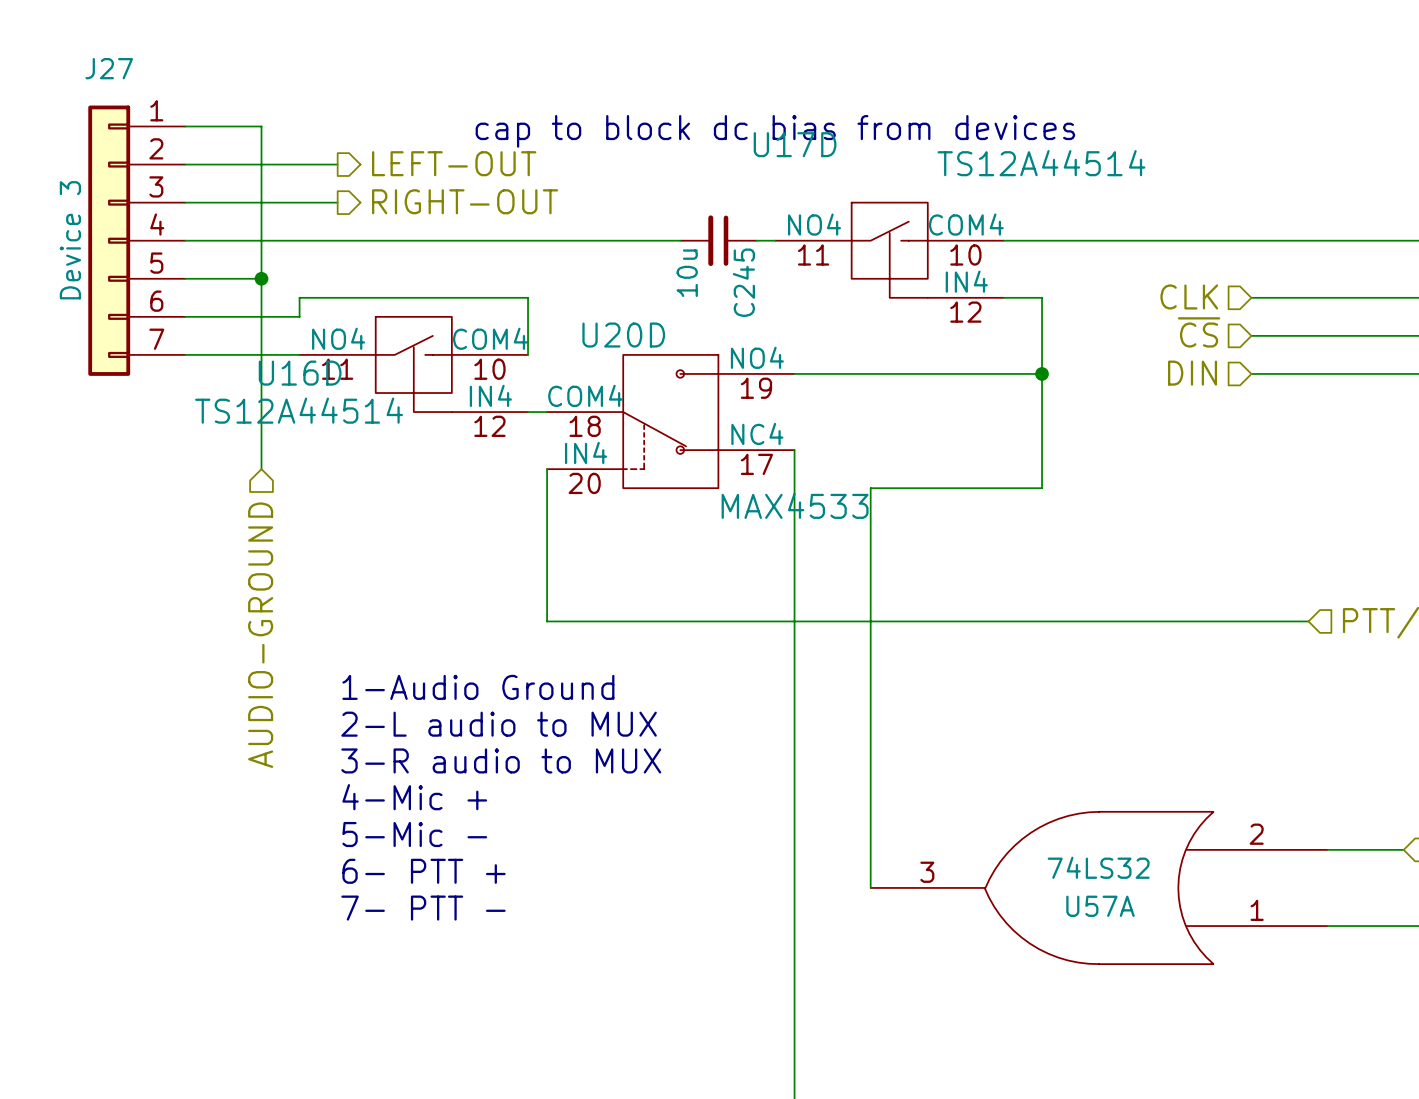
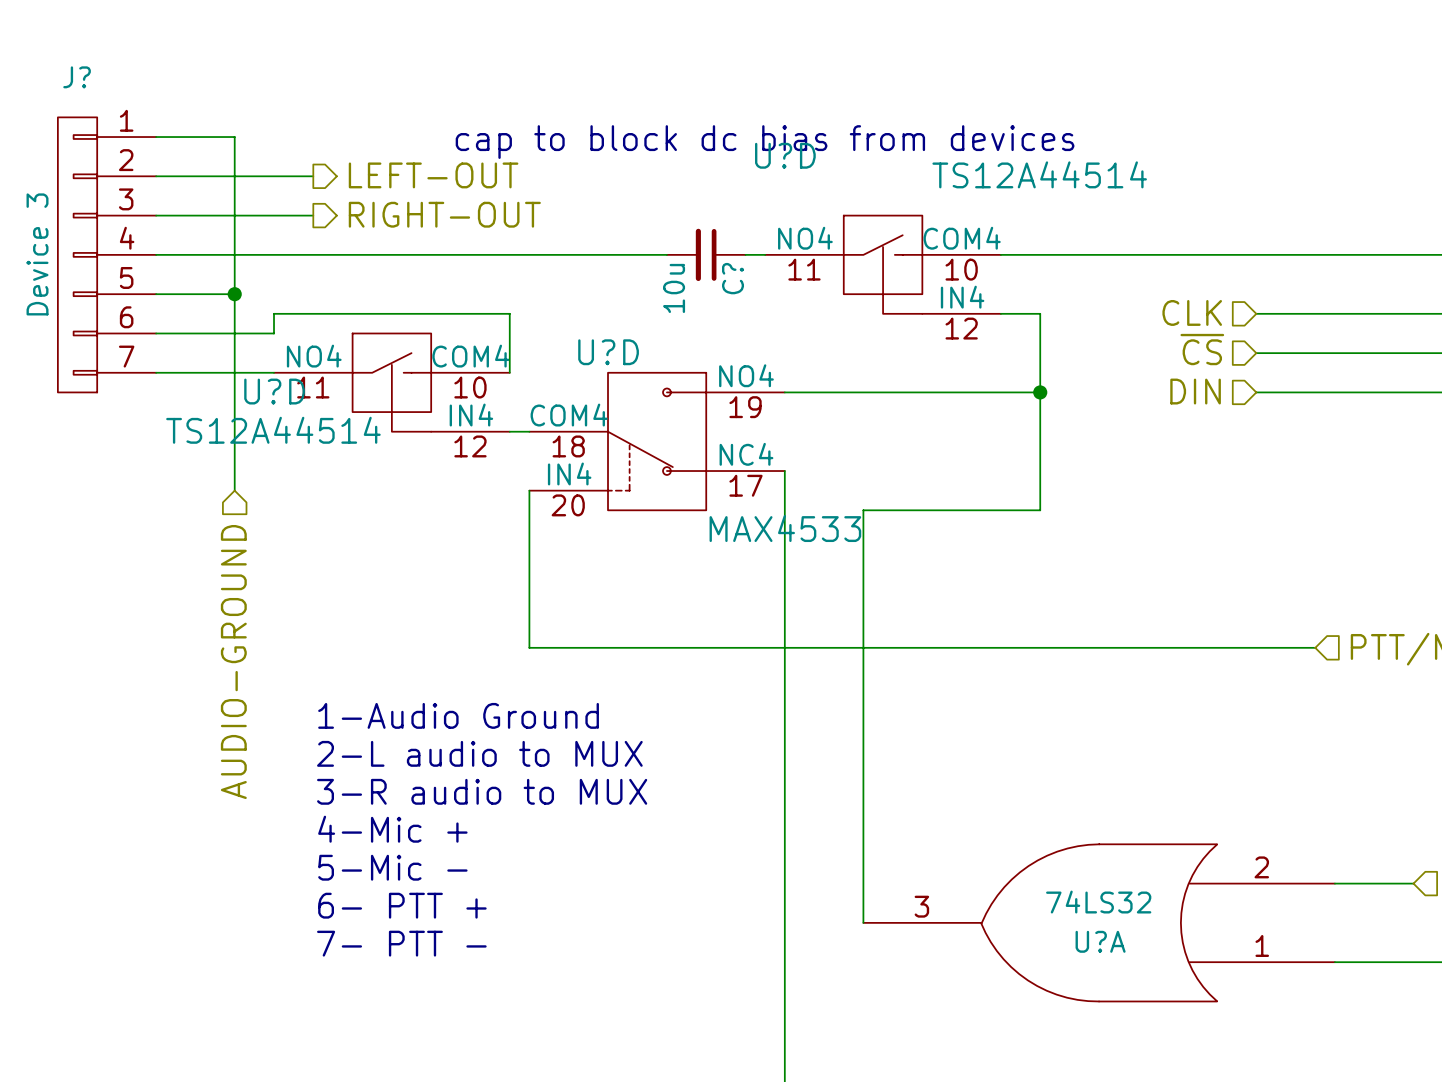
U17D name: U17D (795, 144) -> U?D (785, 155)
J27: Device 3 (136, 240) -> none
J?: none -> Device 3 (107, 254)
C245 name: C245 (743, 282) -> C? (733, 278)
U20D name: U20D (623, 335) -> U?D (608, 352)
U16D name: U16D (300, 373) -> U?D (274, 391)
U57A name: U57A (1100, 906) -> U?A (1100, 941)

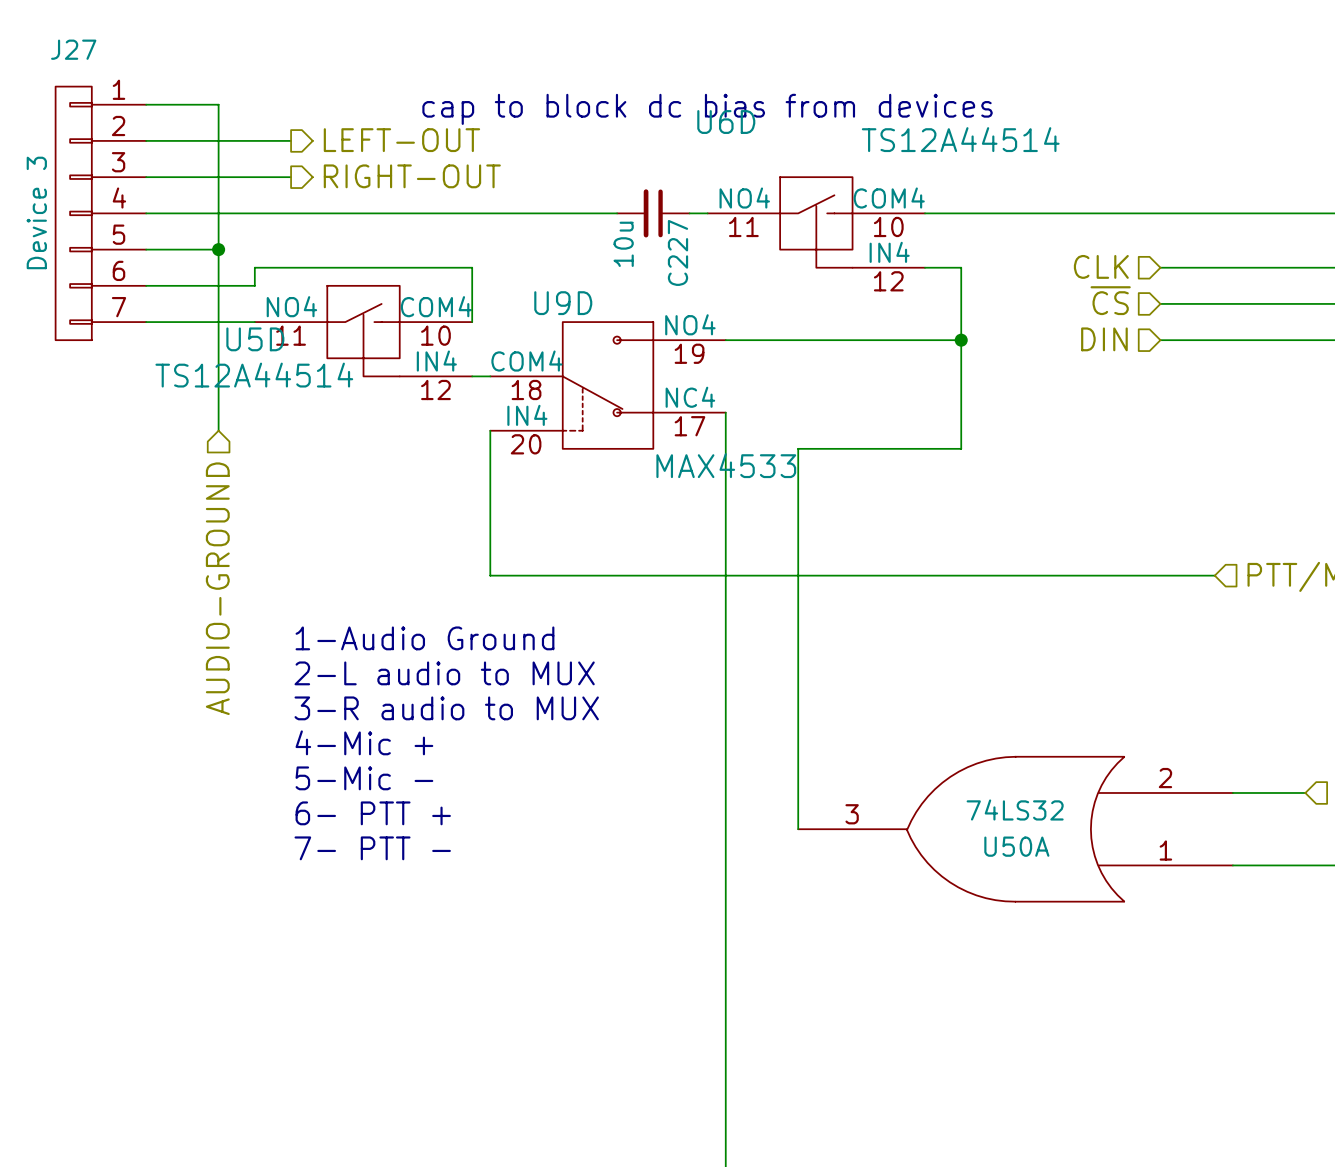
J? name: J? (77, 77) -> J27 (73, 49)
U?D name: U?D (785, 155) -> U6D (726, 122)
C? name: C? (733, 278) -> C227 (677, 252)
U?D name: U?D (608, 352) -> U9D (563, 303)
U?D name: U?D (274, 391) -> U5D (255, 339)
U?A name: U?A (1100, 941) -> U50A (1016, 846)

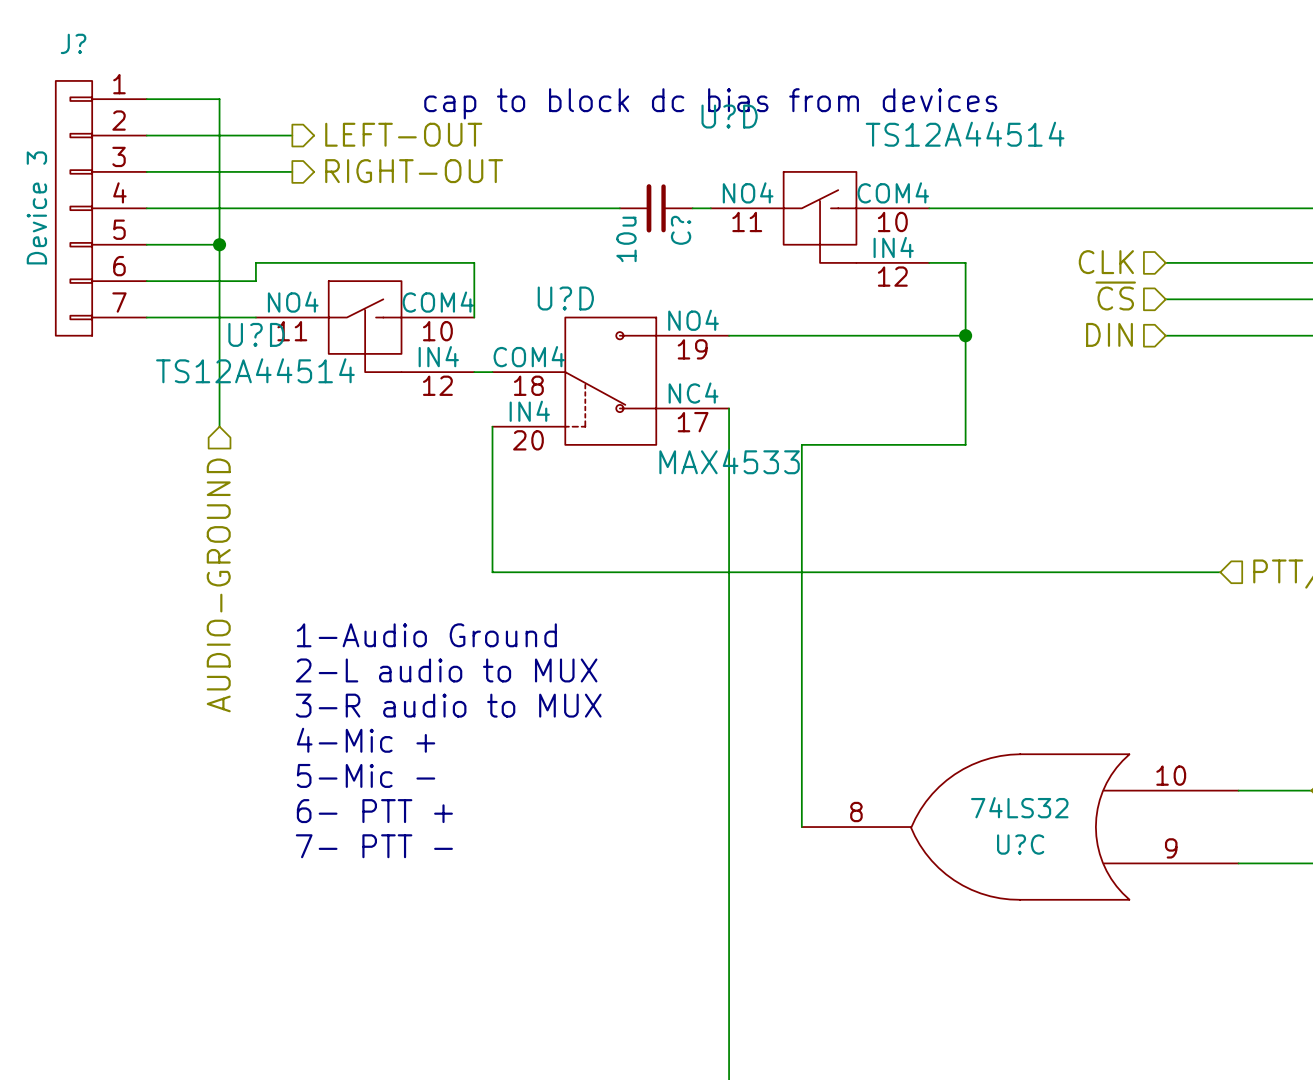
J27 name: J27 (73, 49) -> J? (73, 43)
U6D name: U6D (726, 122) -> U?D (729, 116)
C227 name: C227 (677, 252) -> C? (681, 230)
U9D name: U9D (563, 303) -> U?D (565, 298)
U5D name: U5D (255, 339) -> U?D (256, 334)
U50A pin number: 2 (1165, 778) -> 10 (1171, 775)
U50A pin number: 3 (852, 814) -> 8 (856, 812)
U50A name: U50A (1016, 846) -> U?C (1020, 844)
U50A pin number: 1 (1165, 850) -> 9 (1171, 848)

